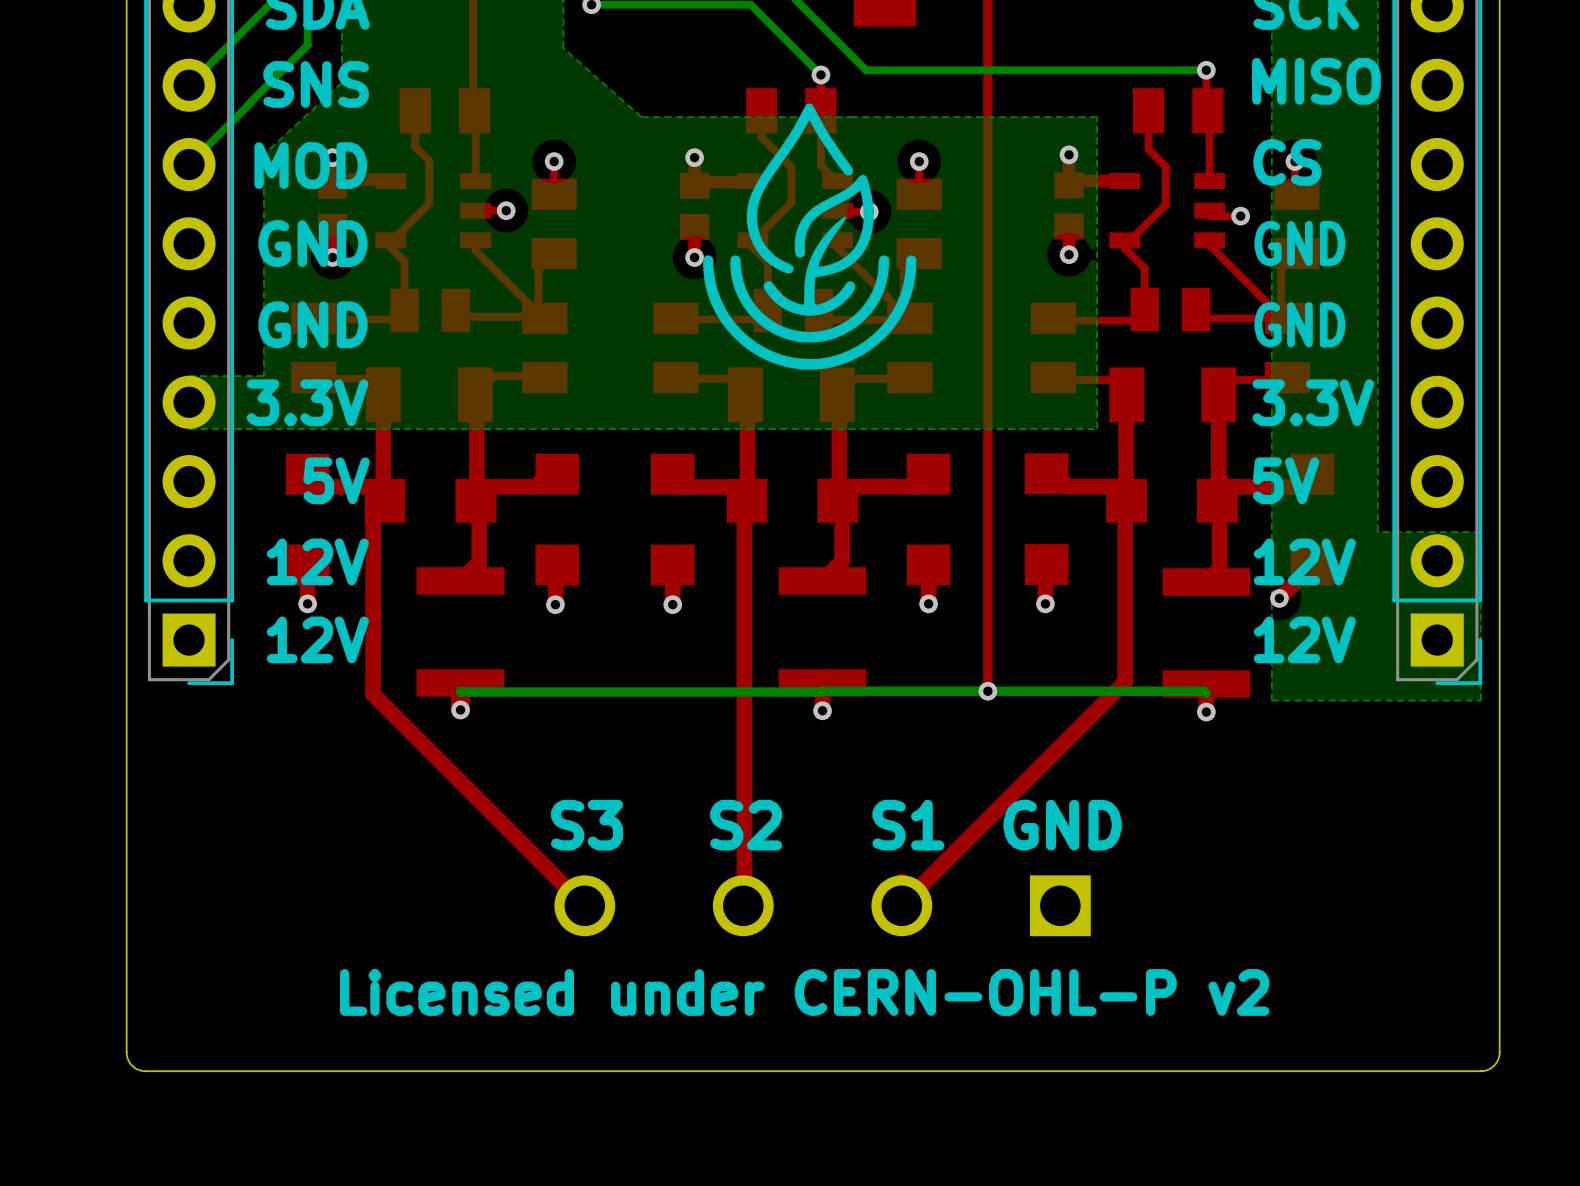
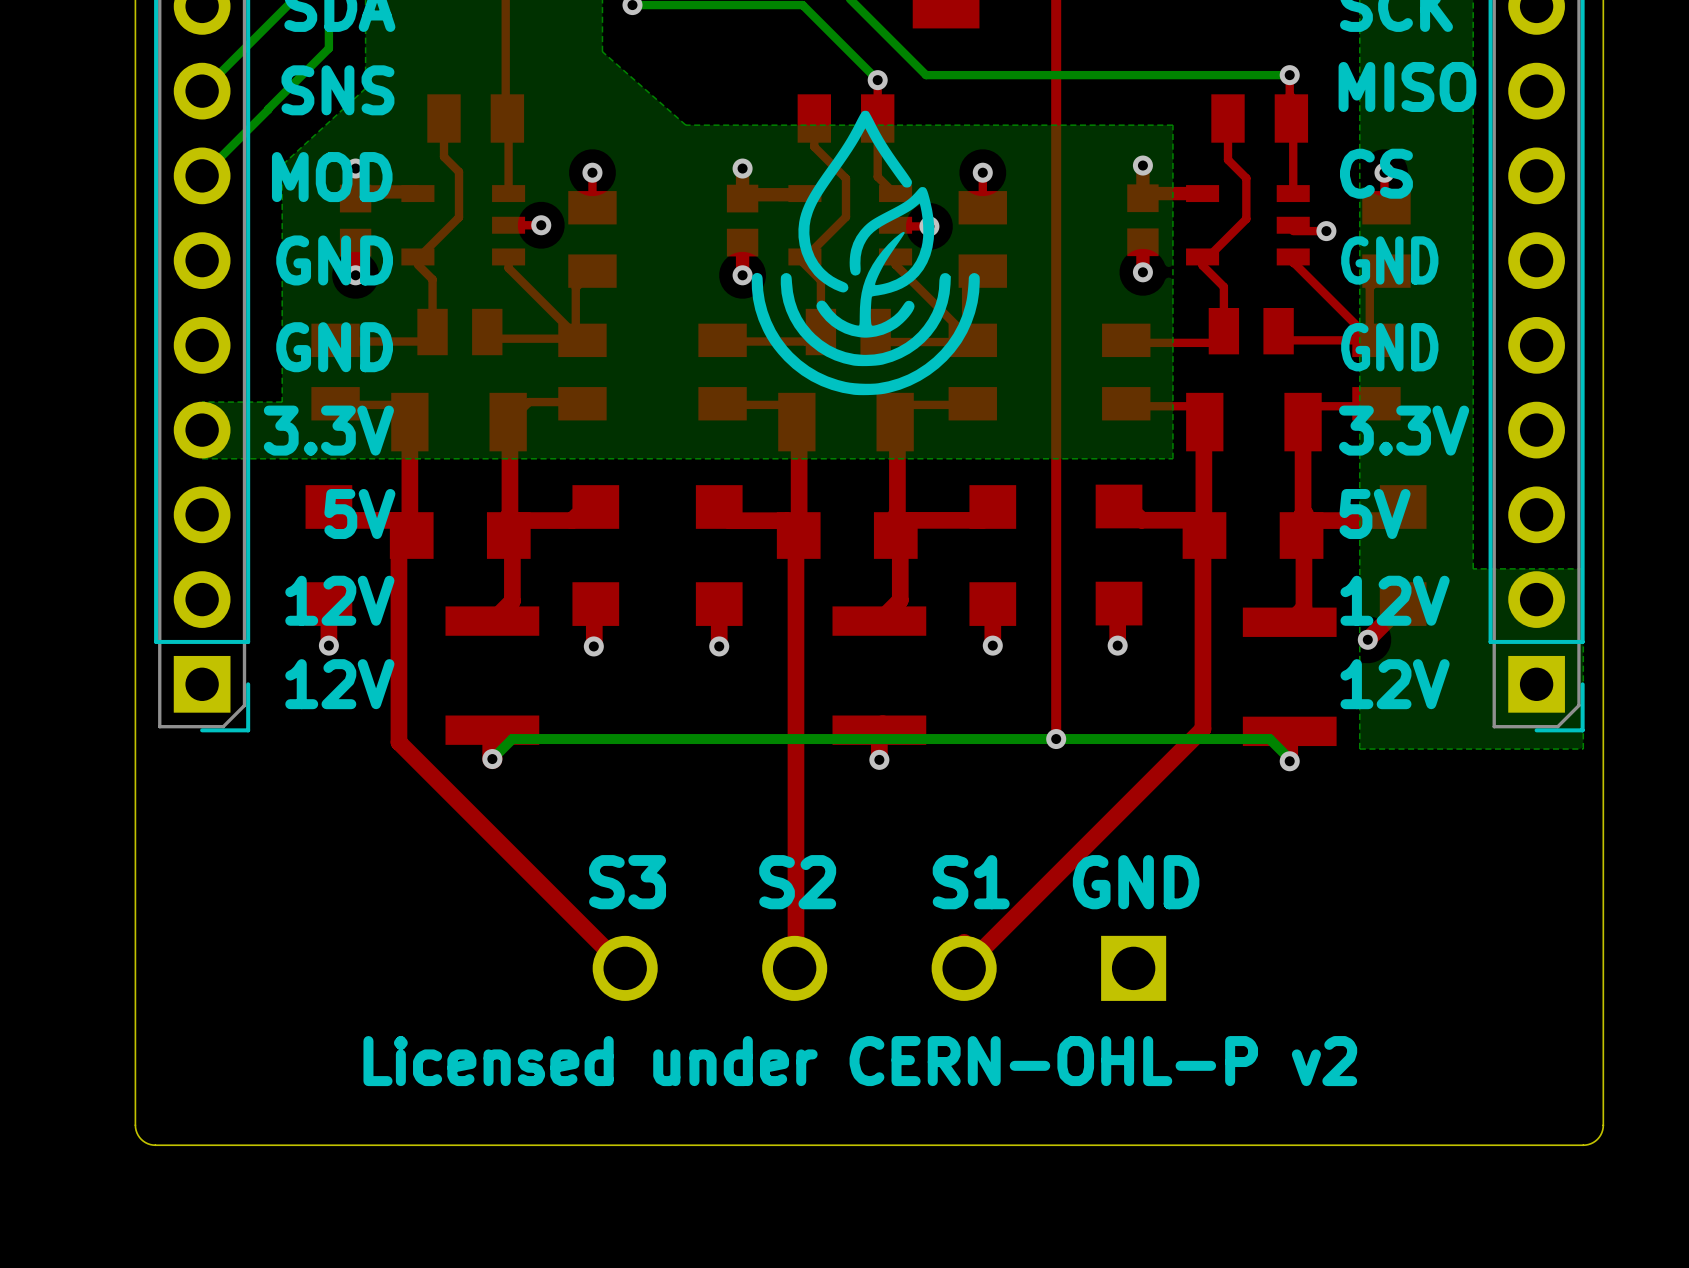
bottom track: (823, 691) (460, 691) -> (880, 739) (512, 739) (492, 759)
bottom track: (1187, 691) (1204, 691) (1206, 693) -> (1269, 739) (1289, 761)

